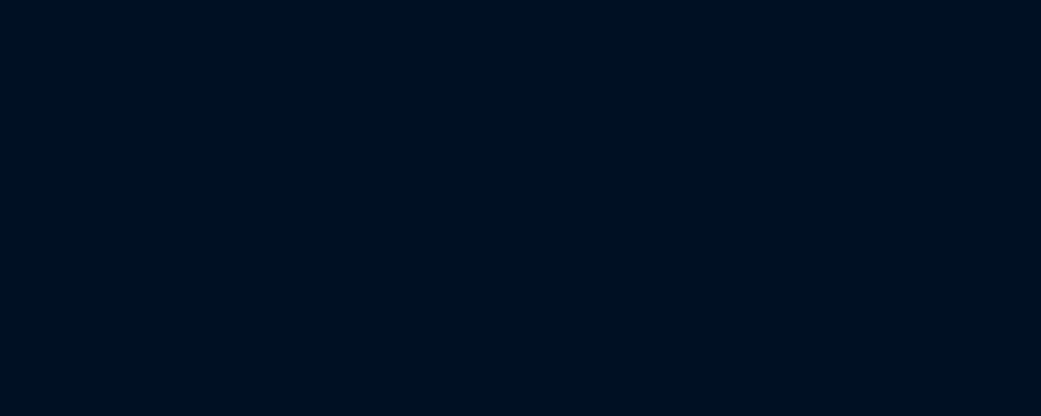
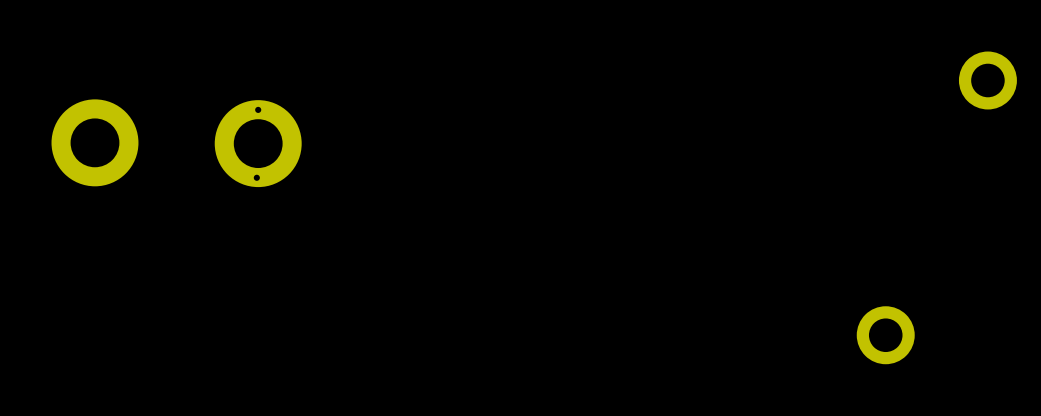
part: none -> (987, 80)
part: none -> (94, 142)
part: none -> (258, 143)
part: none -> (885, 335)

